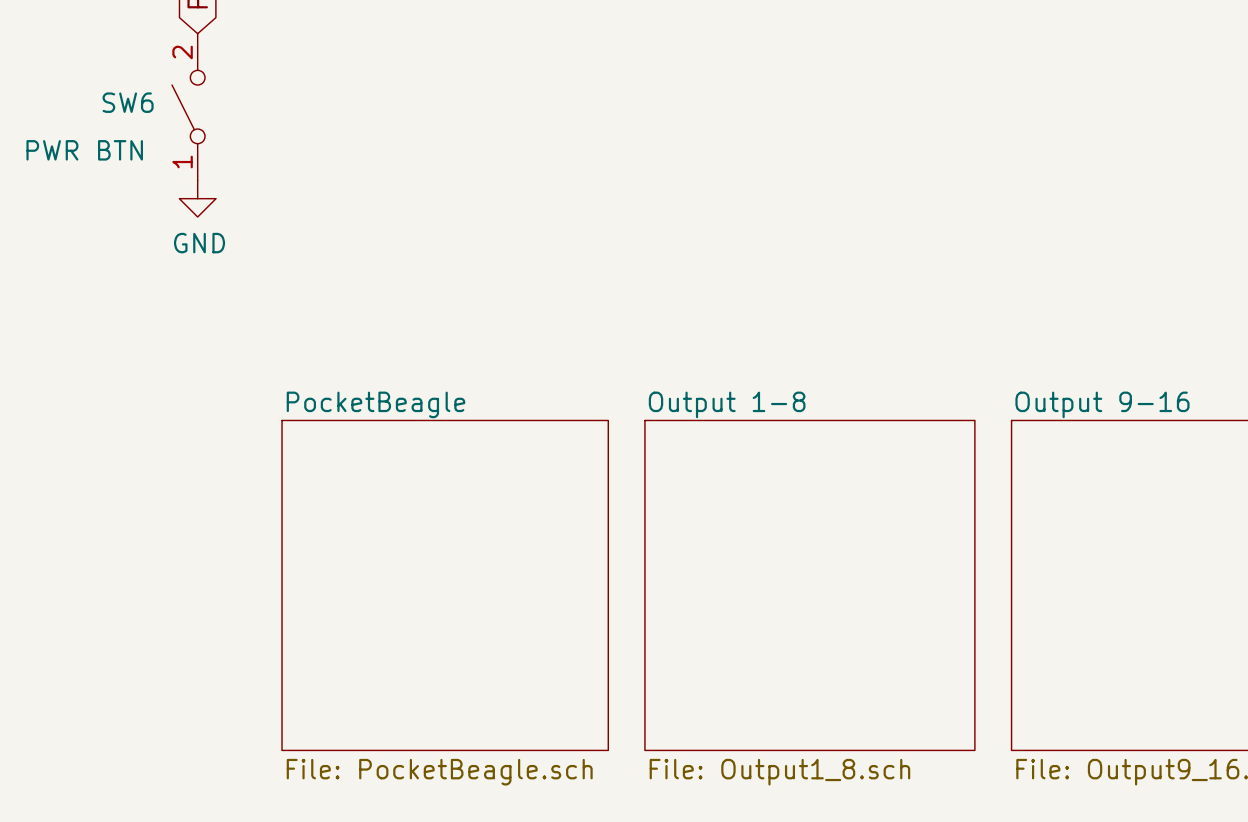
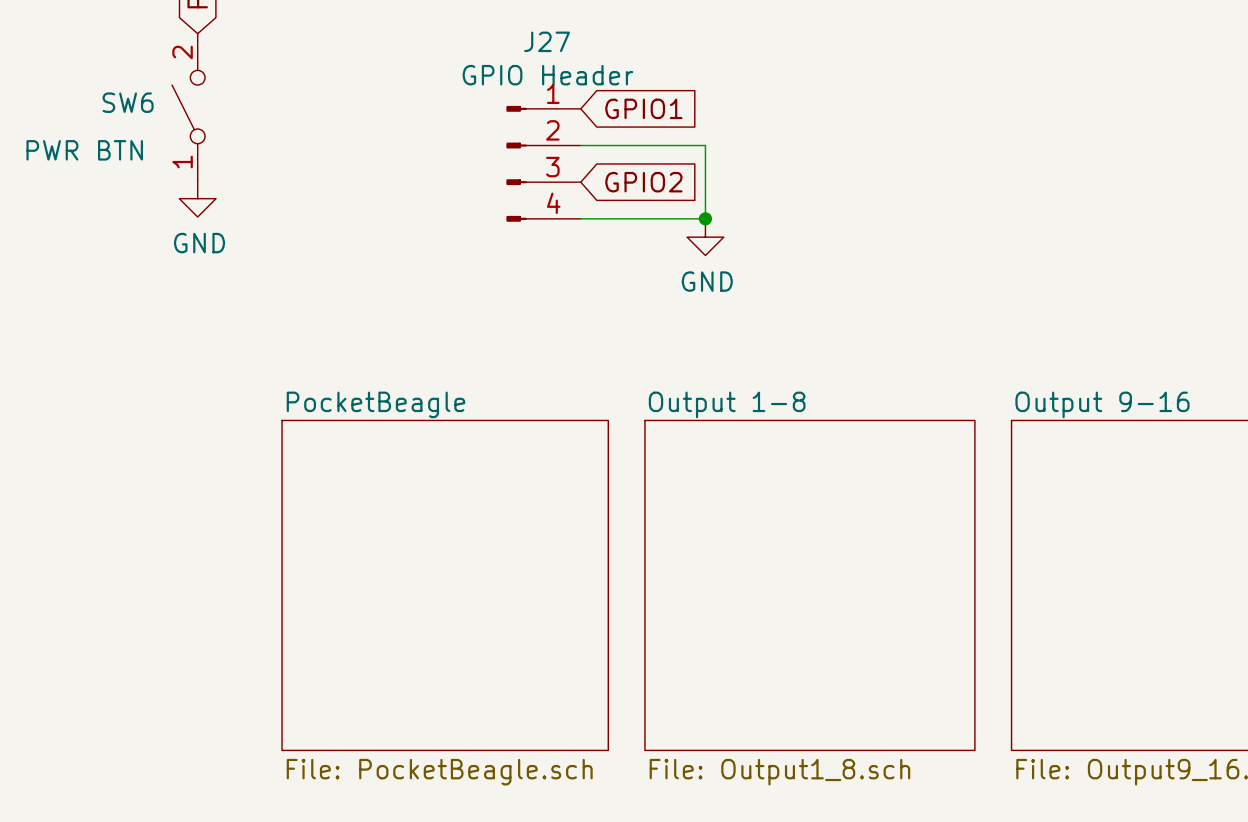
global label: none -> GPIO1 (643, 108)
wire: none -> (580, 145) (705, 145) (705, 218) (580, 218)
J27: none -> GPIO Header (543, 163)
global label: none -> GPIO2 (643, 182)
junction: none -> (705, 218)
power symbol: none -> GND (705, 237)

